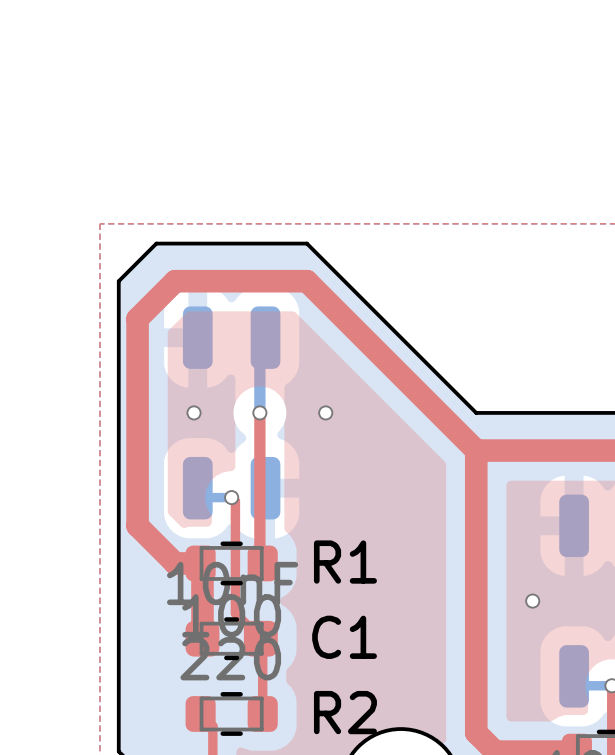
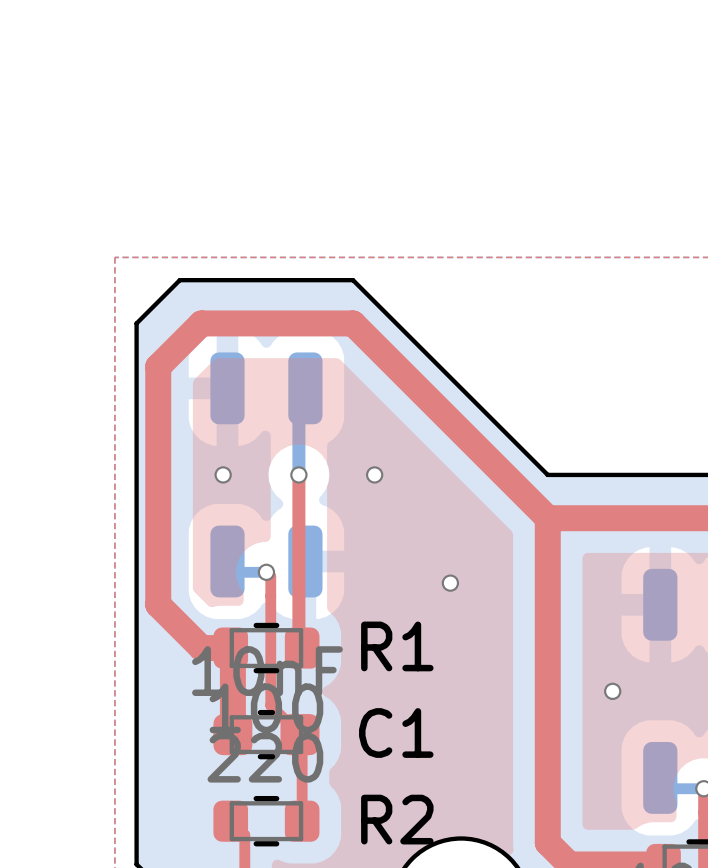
via: none -> (450, 583)

